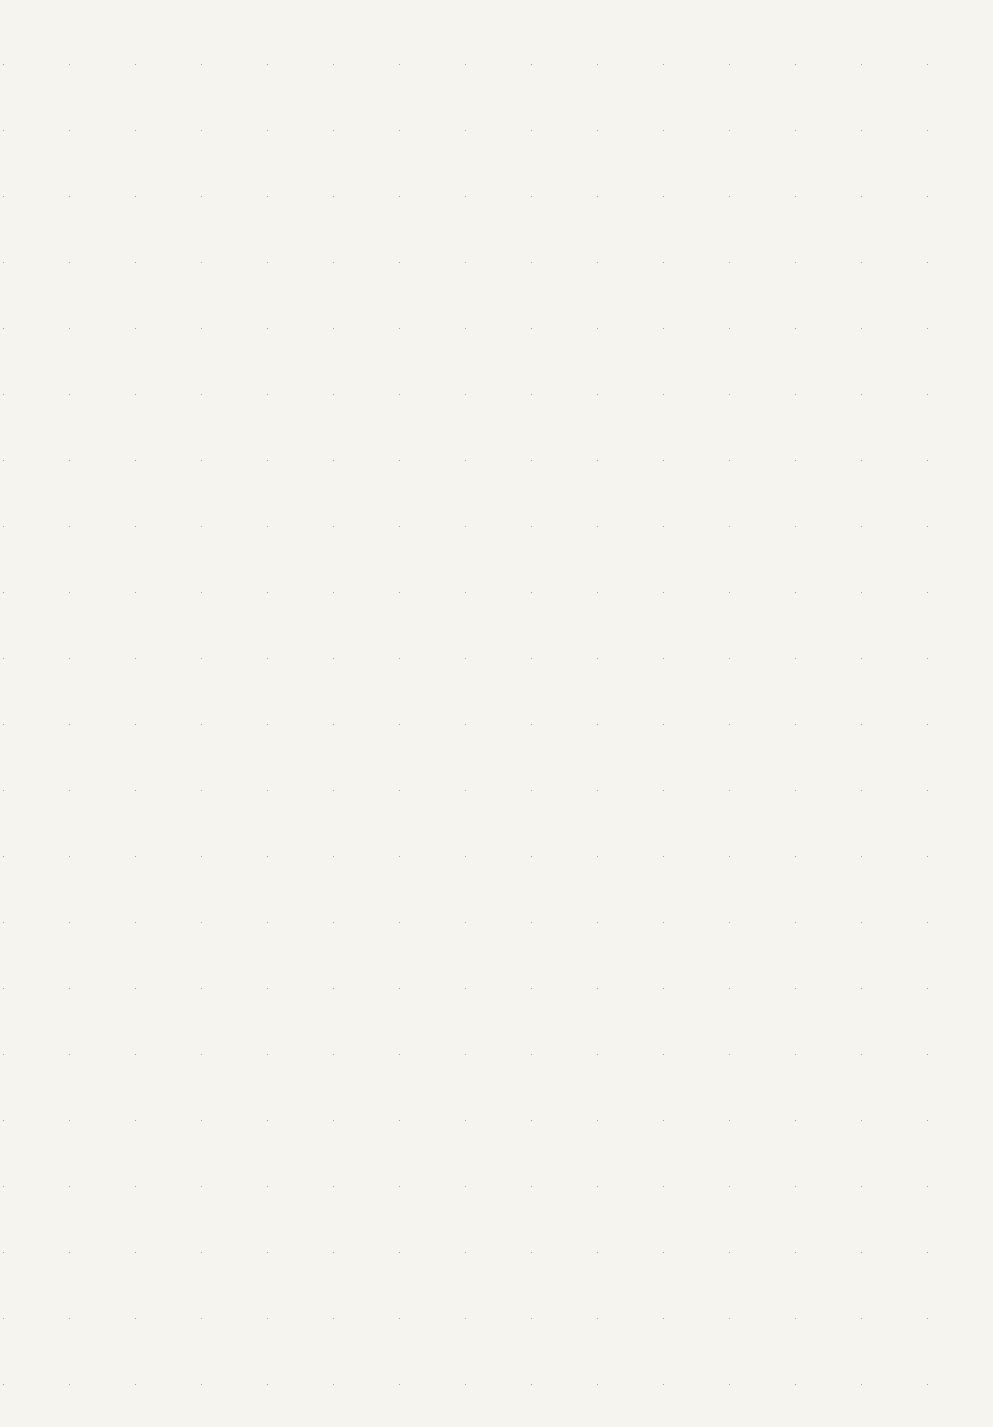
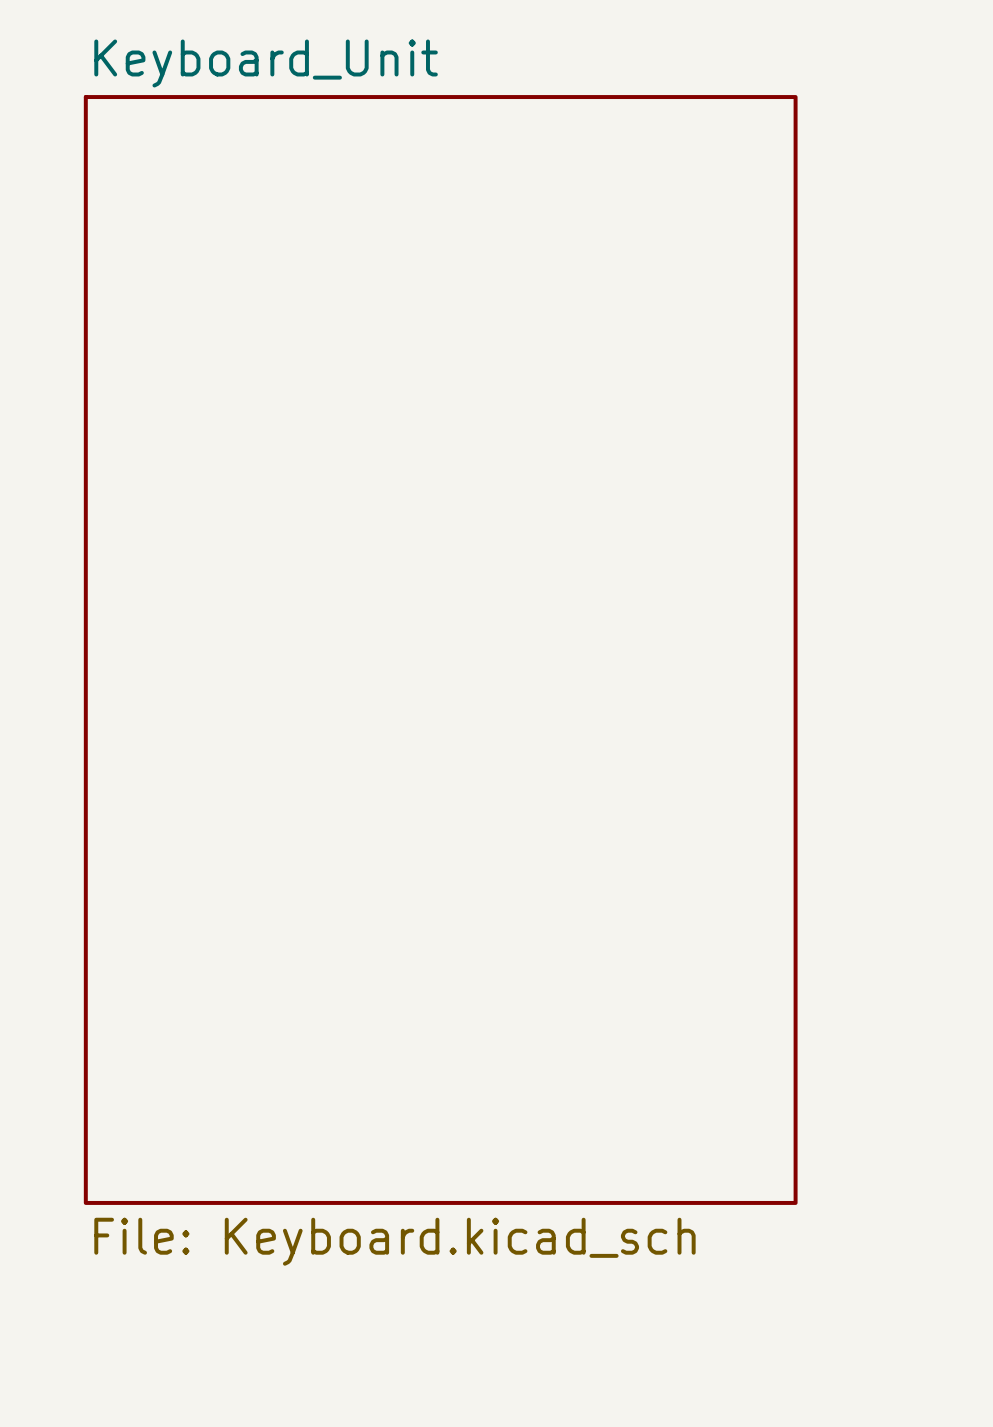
sheet Keyboard_Unit: none -> File: Keyboard.kicad_sch (440, 649)

